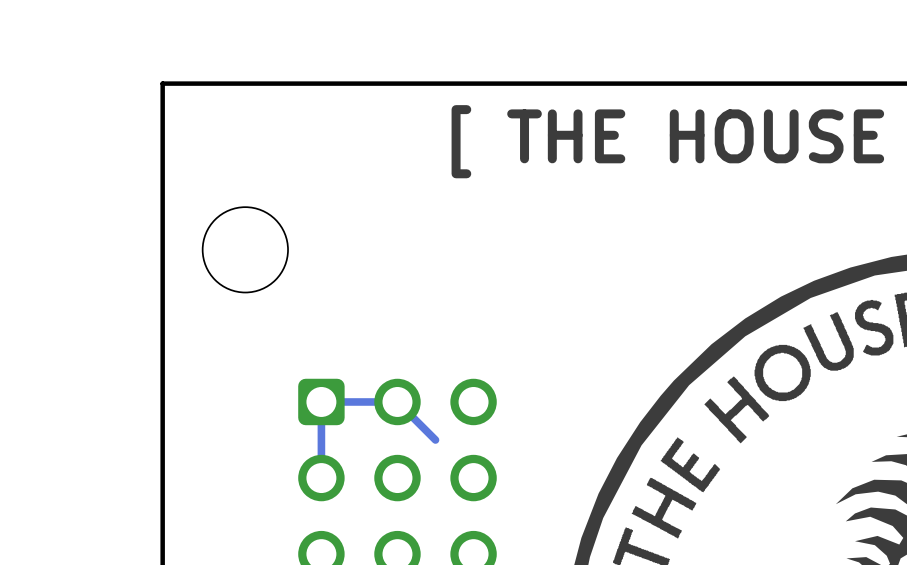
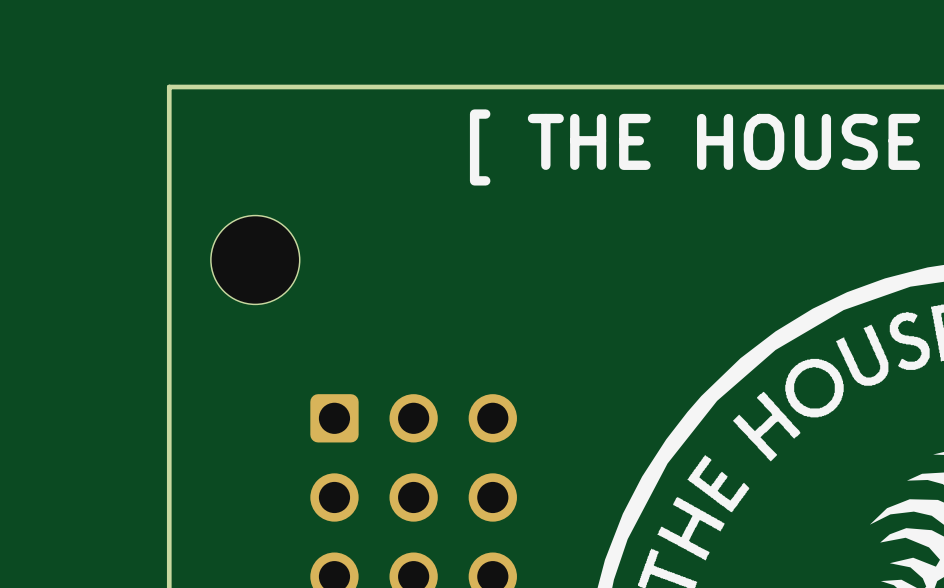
track: (435, 440) (397, 401) (321, 401) (321, 478) -> none

